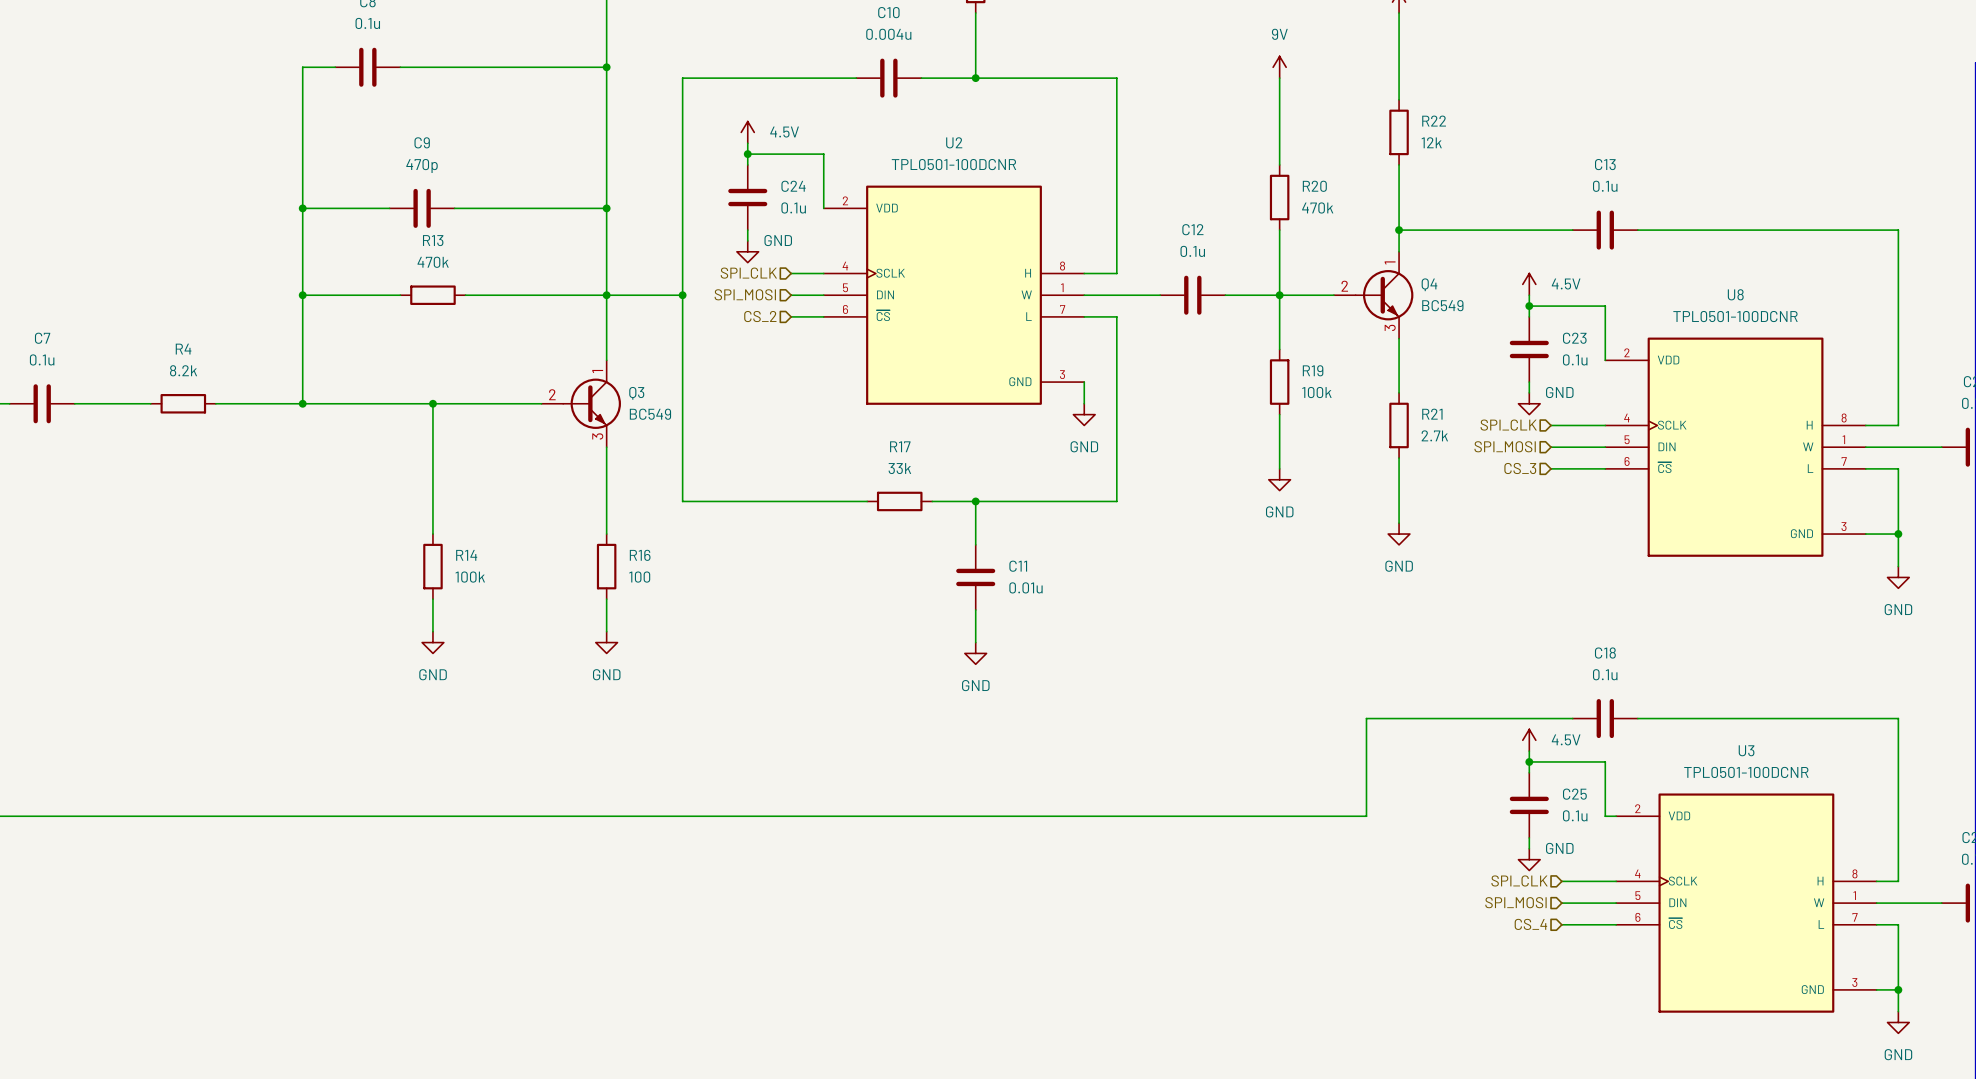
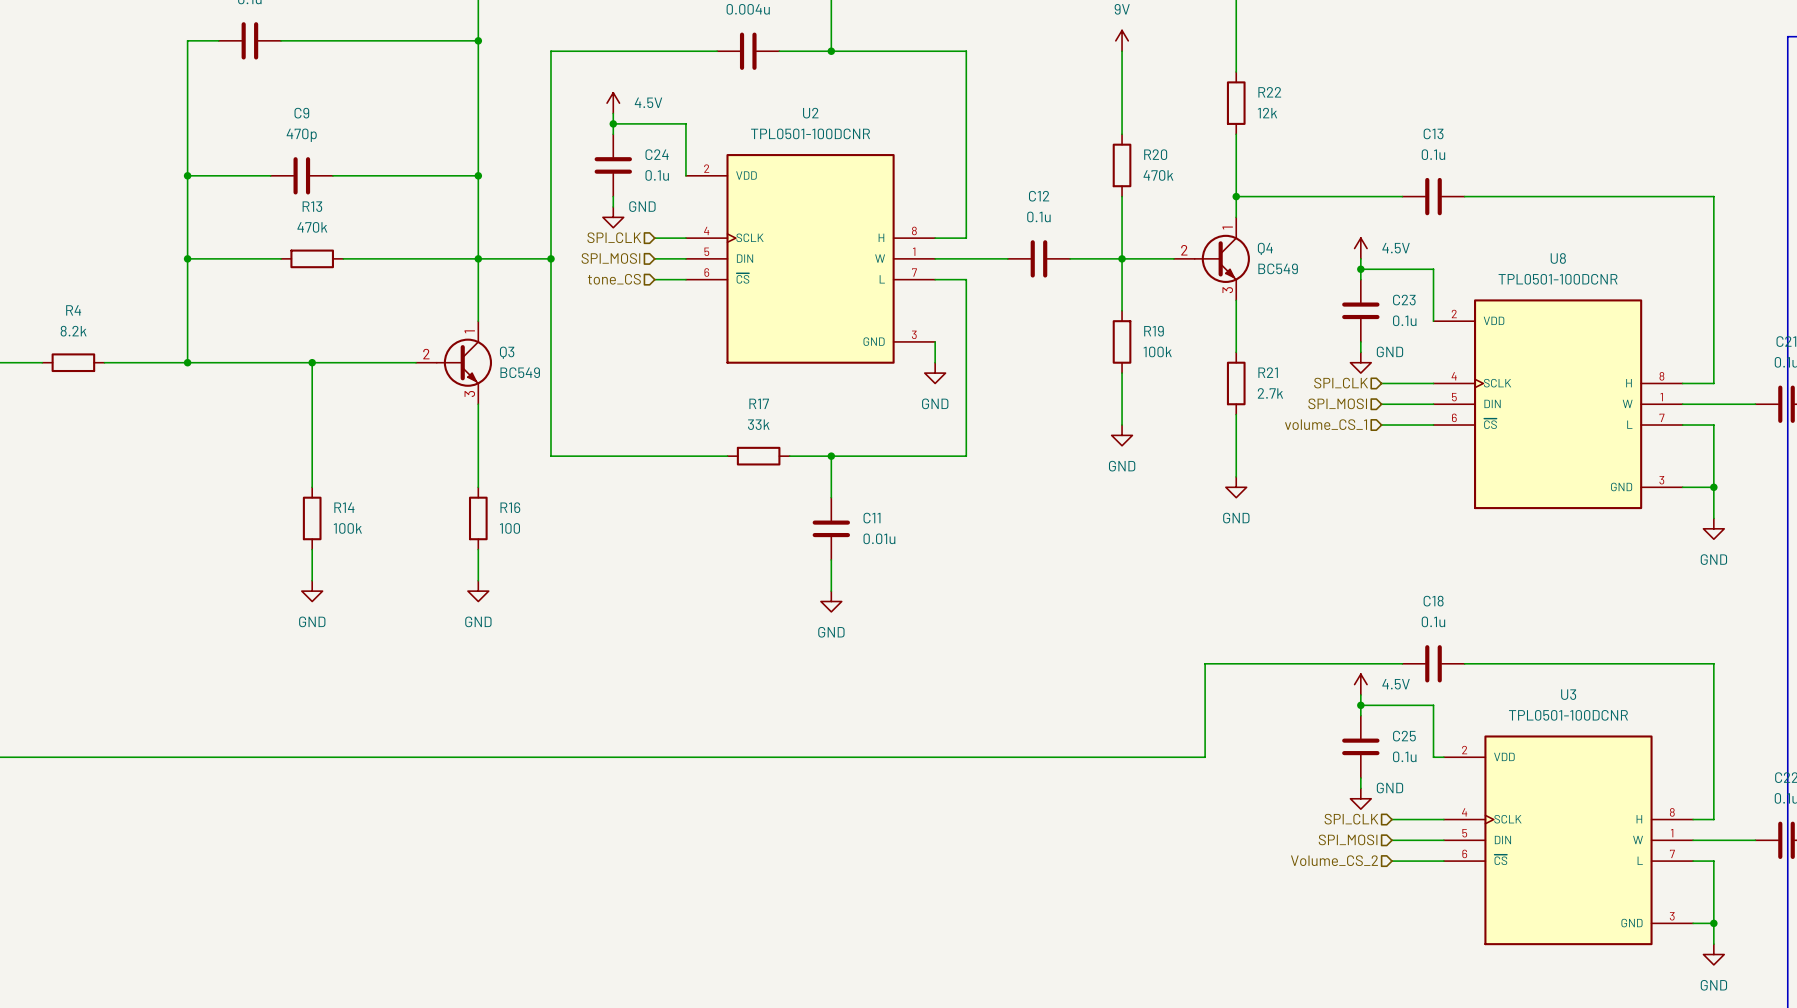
hierarchical label: CS_2 (760, 316) -> tone_CS (614, 279)
hierarchical label: CS_3 (1520, 468) -> volume_CS_1 (1326, 424)
hierarchical label: CS_4 (1530, 924) -> Volume_CS_2 (1334, 860)

